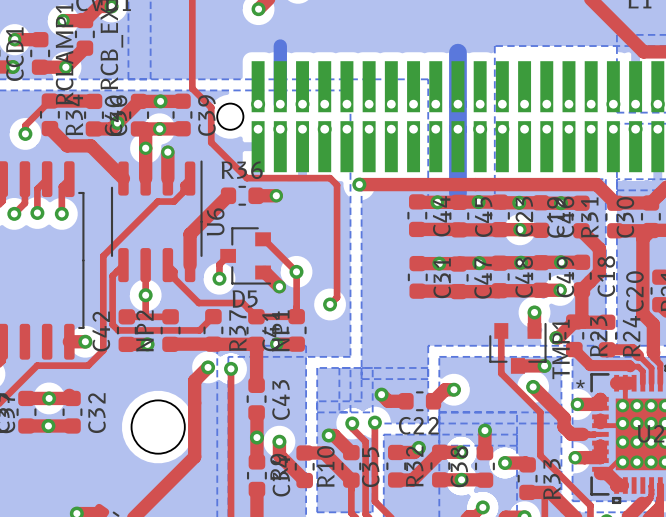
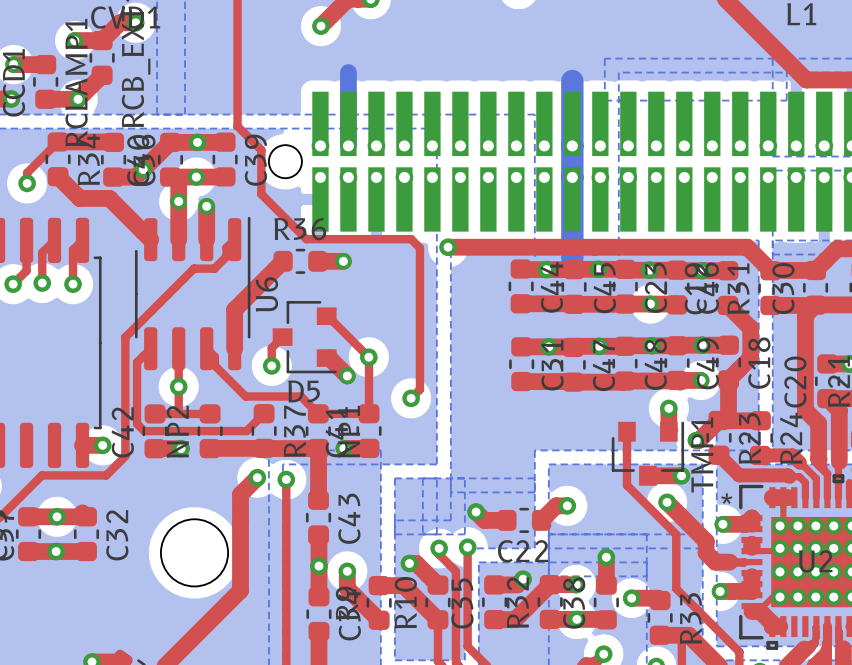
bottom zone outline: none -> (772, 58) (604, 58) (604, 100) (786, 100) (786, 58)

